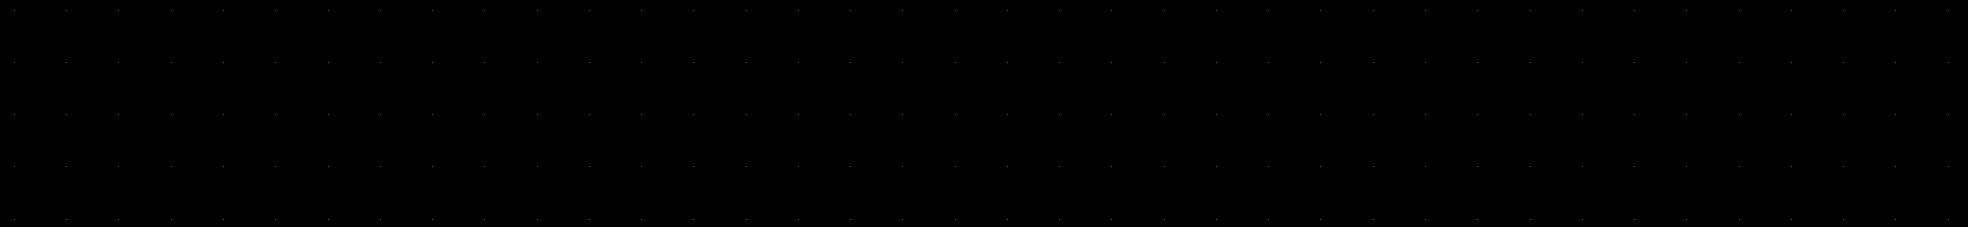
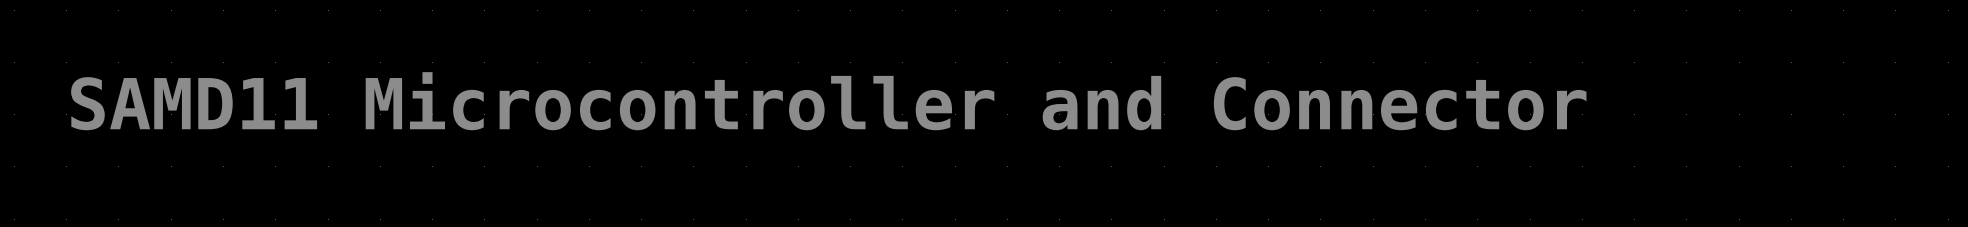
text: none -> SAMD11 Microcontroller and Connector (828, 101)

